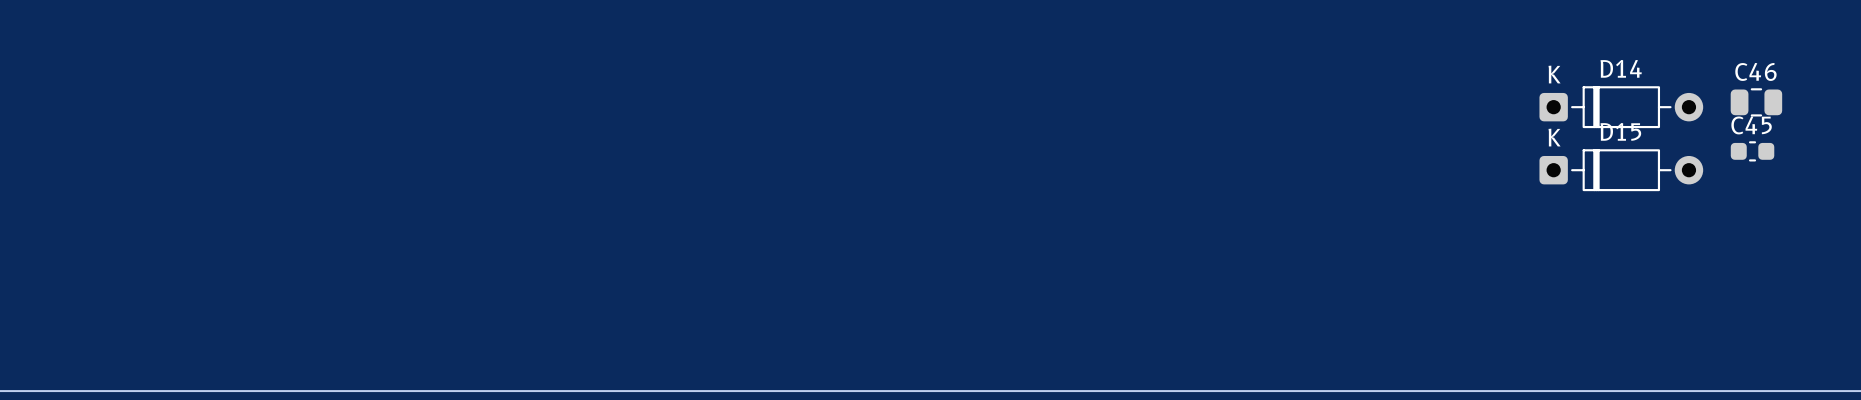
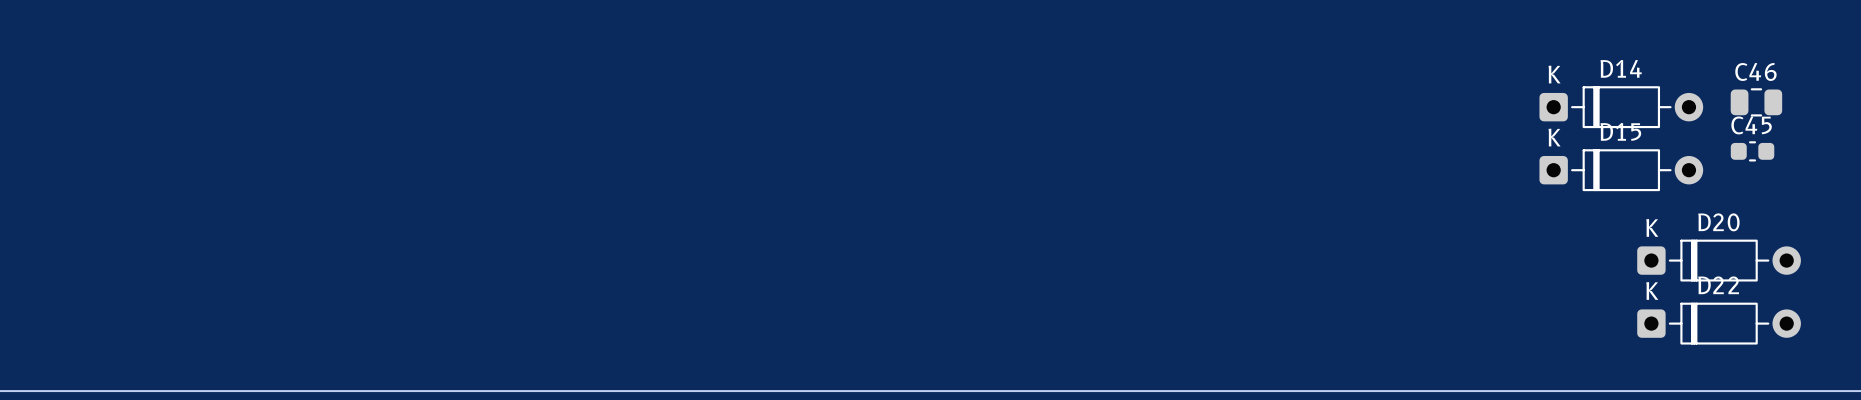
D20: none -> (1719, 260)
D22: none -> (1719, 323)

